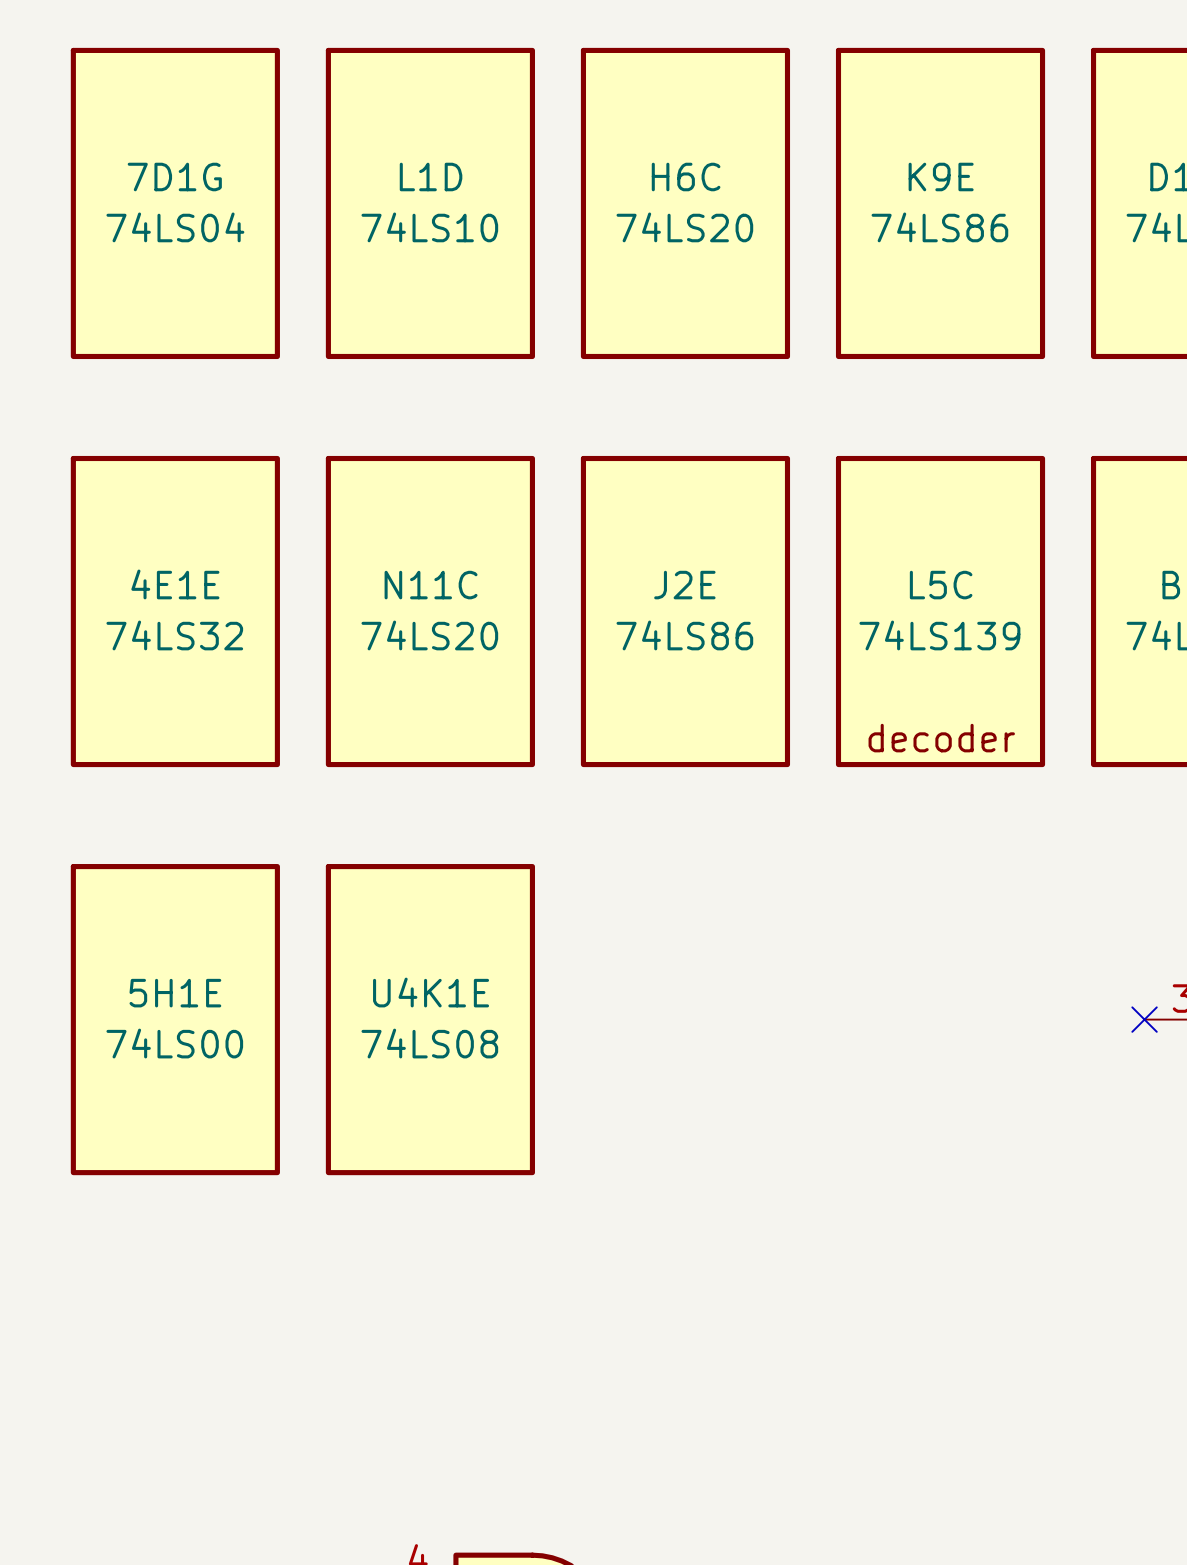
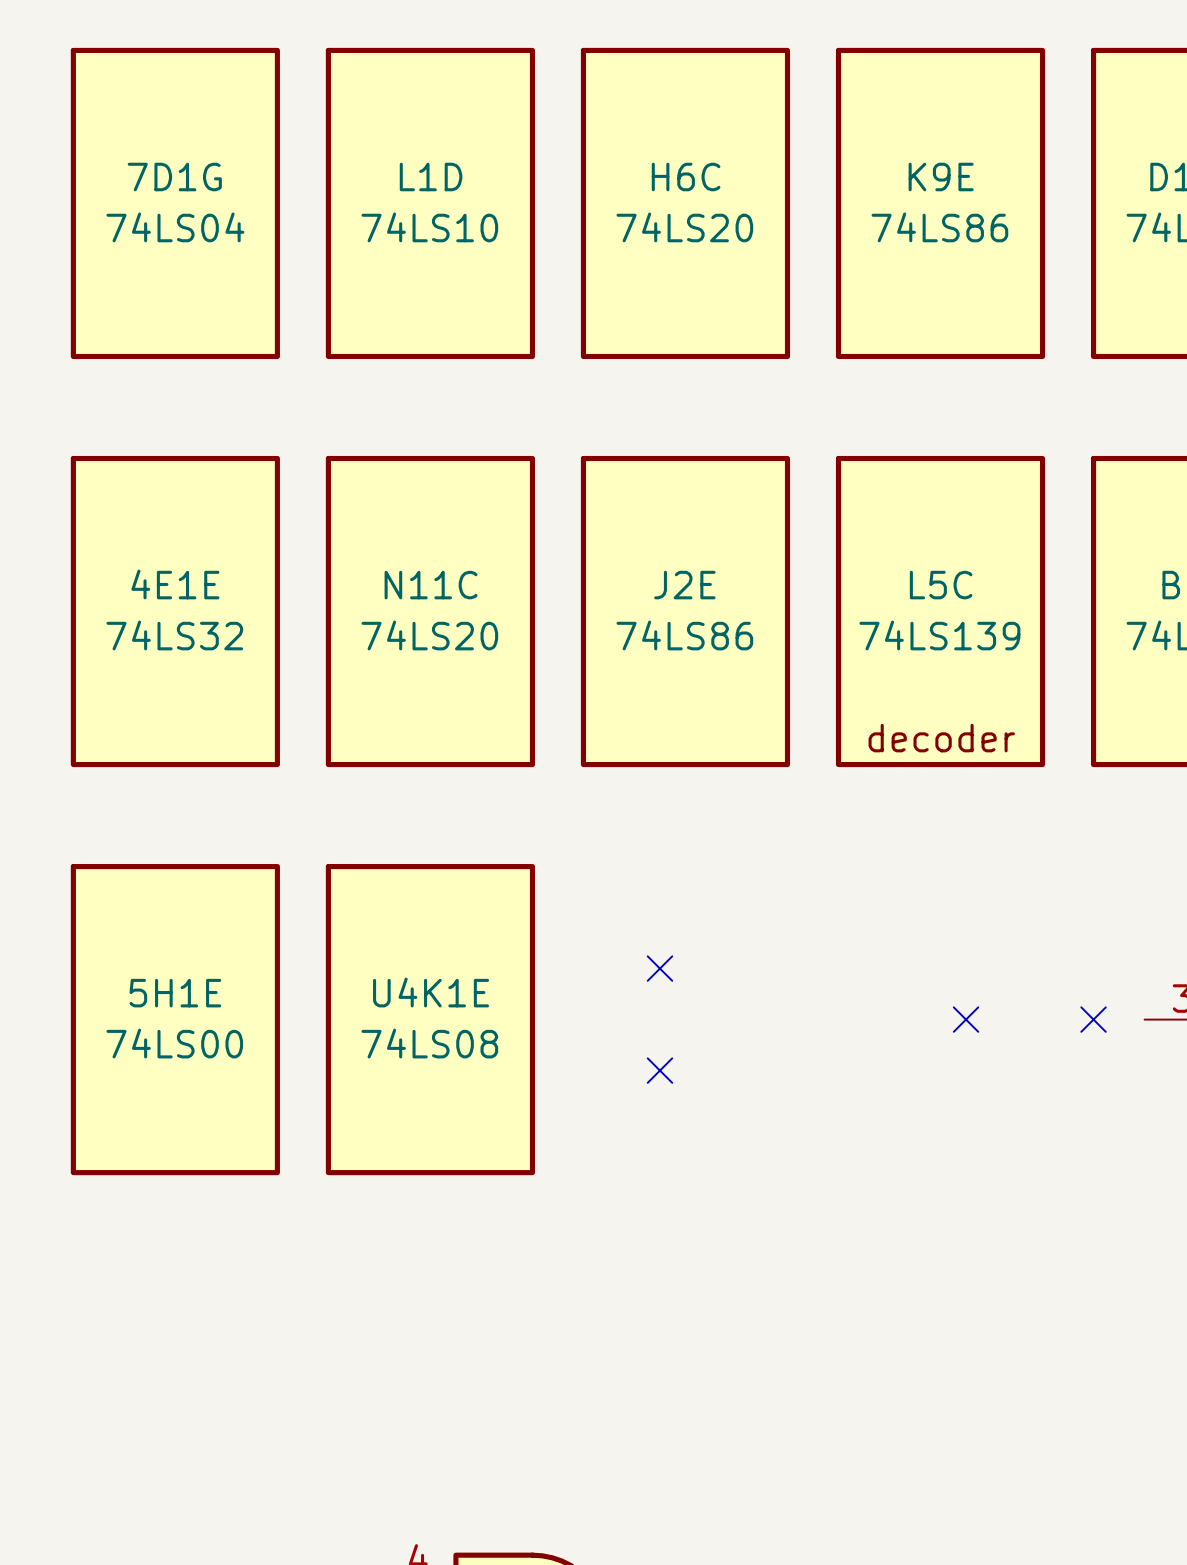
no-connect mark: none -> (659, 968)
no-connect mark: none -> (966, 1019)
no-connect mark position: (1144, 1019) -> (1093, 1019)
no-connect mark: none -> (659, 1070)

